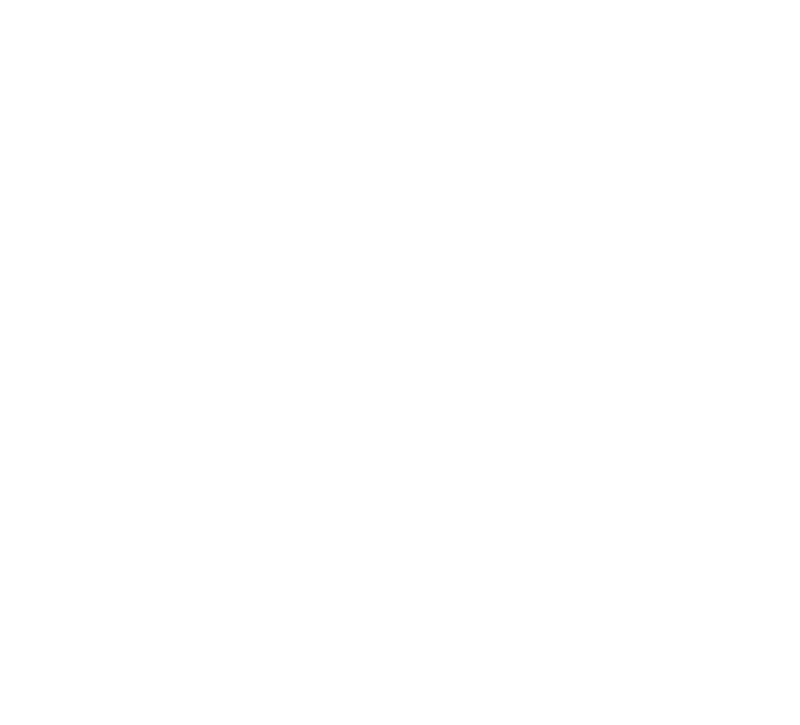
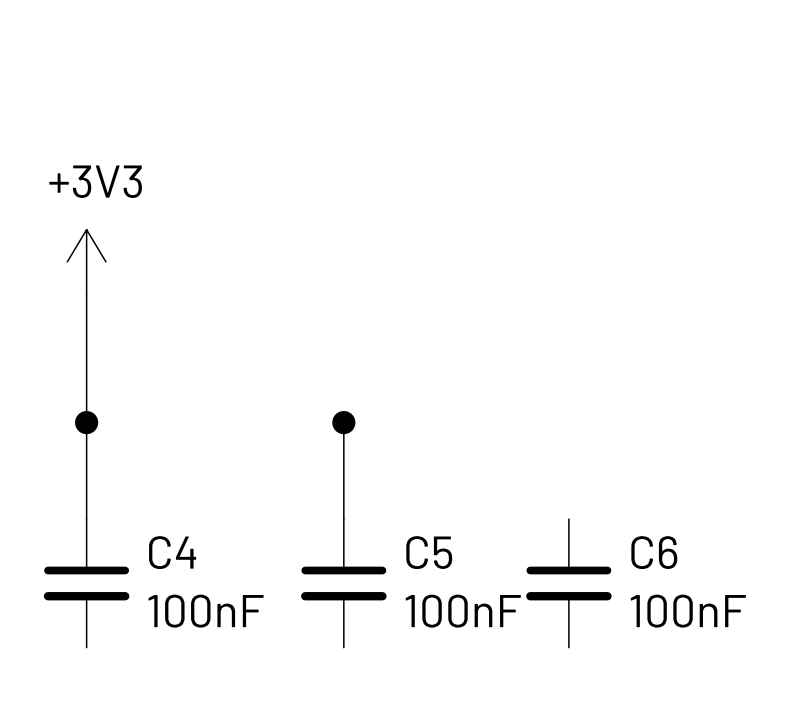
power symbol: none -> +3V3 (86, 261)
wire: none -> (86, 293) (86, 519)
junction: none -> (86, 422)
wire: none -> (343, 422) (343, 519)
junction: none -> (343, 422)
C4: none -> 100nF (86, 583)
C5: none -> 100nF (343, 583)
C6: none -> 100nF (568, 583)

